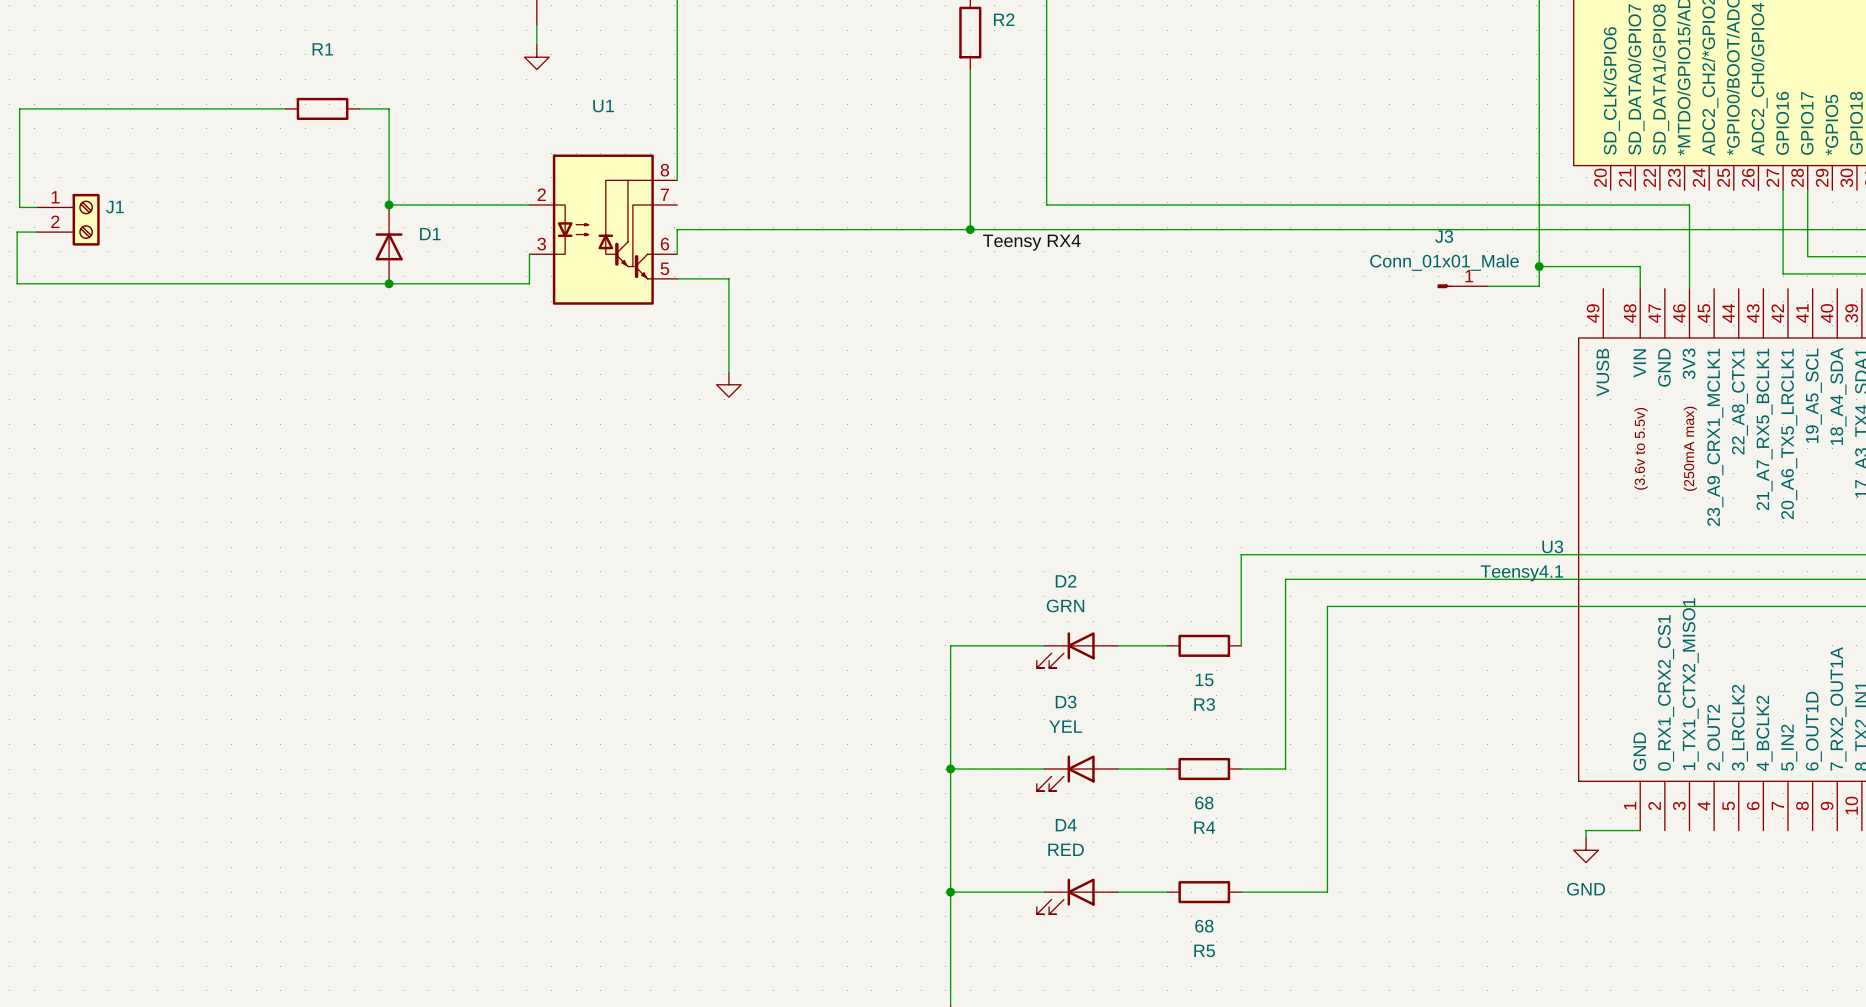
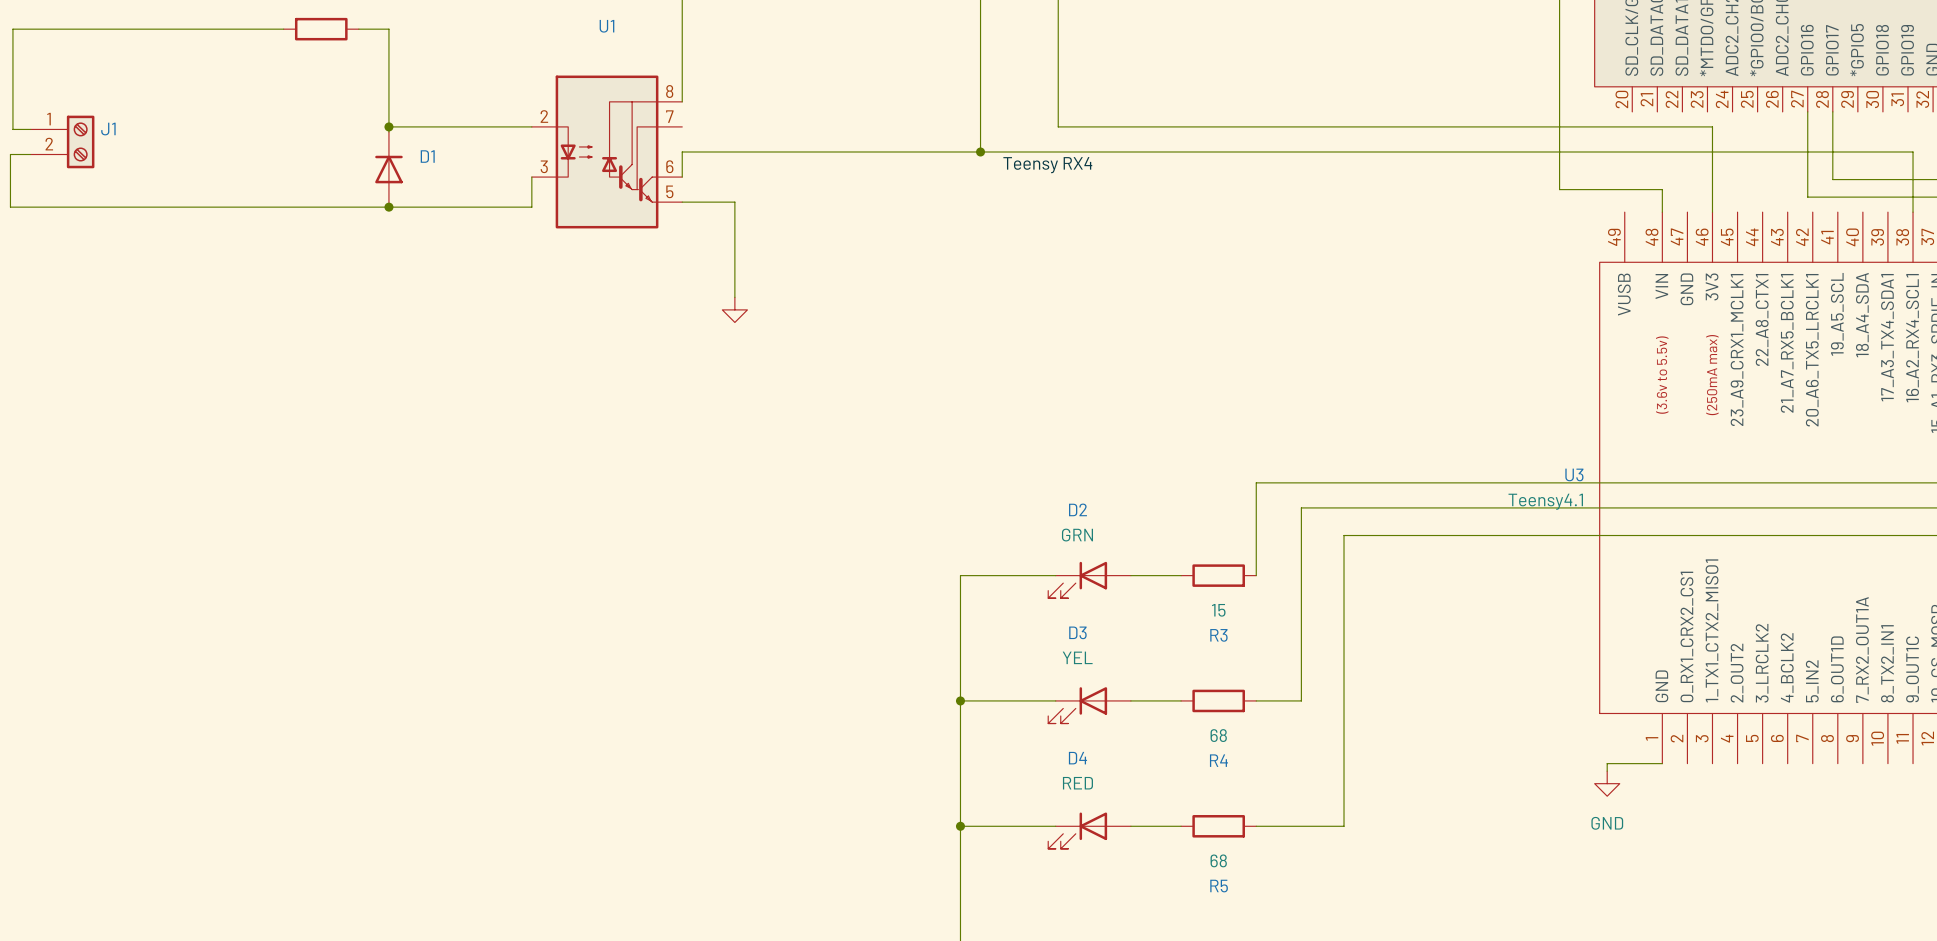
wire: (1539, 266) (1539, 286) (1487, 286) -> none
junction: (1539, 266) -> none
J3: Conn_01x01_Male (1462, 286) -> none

